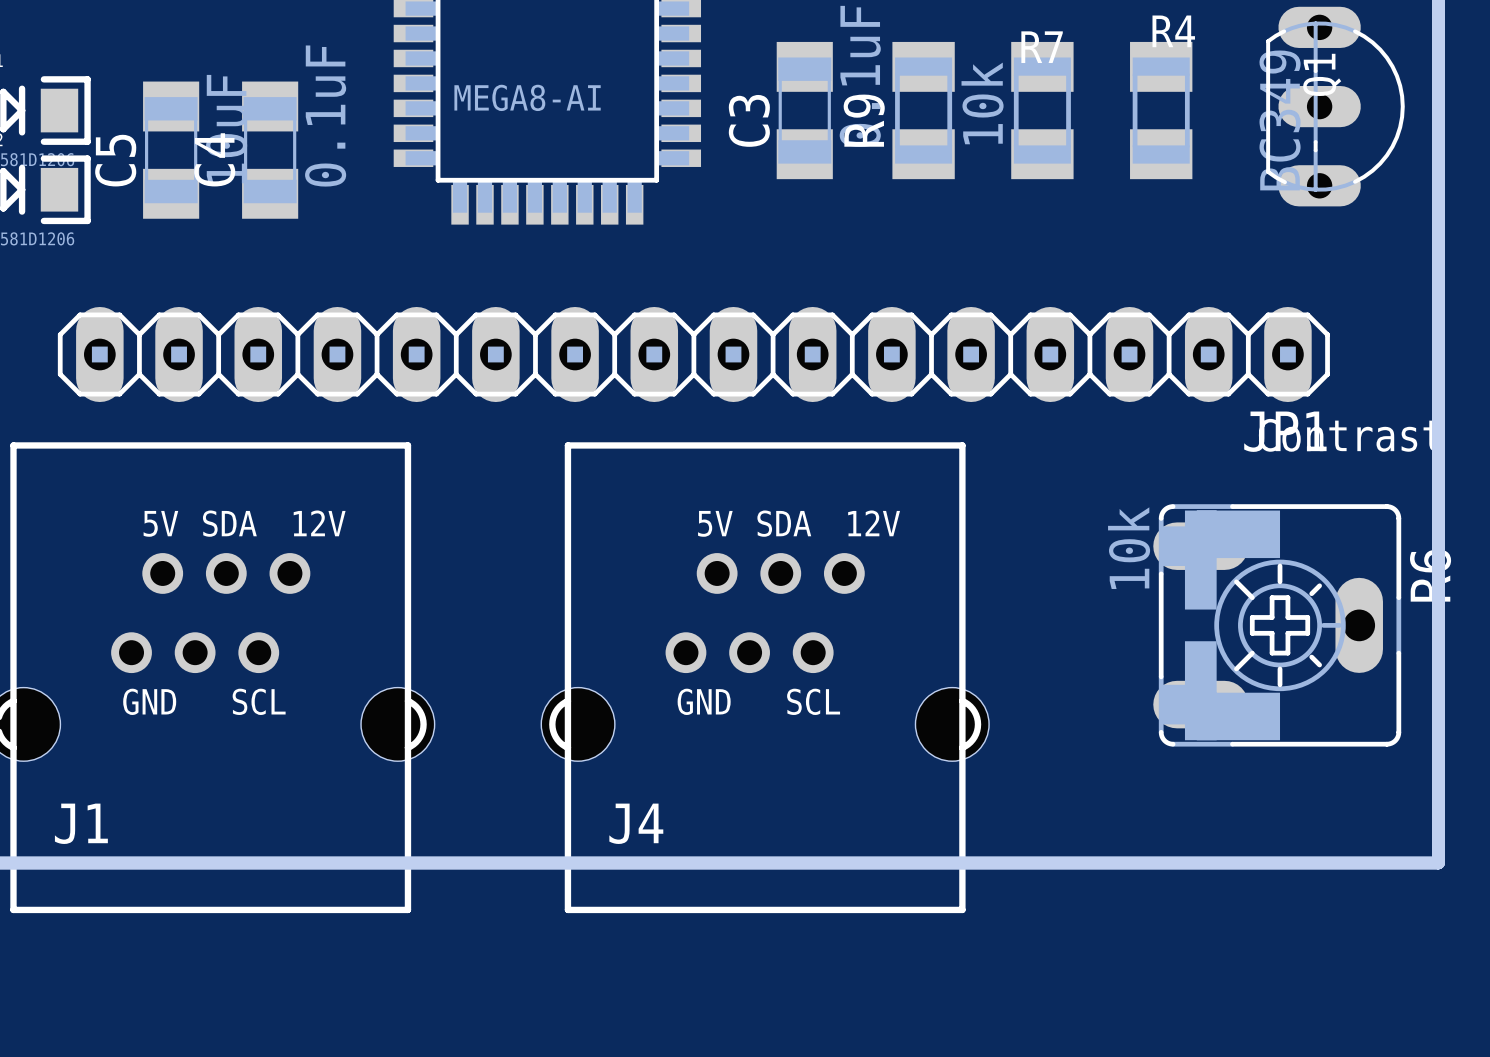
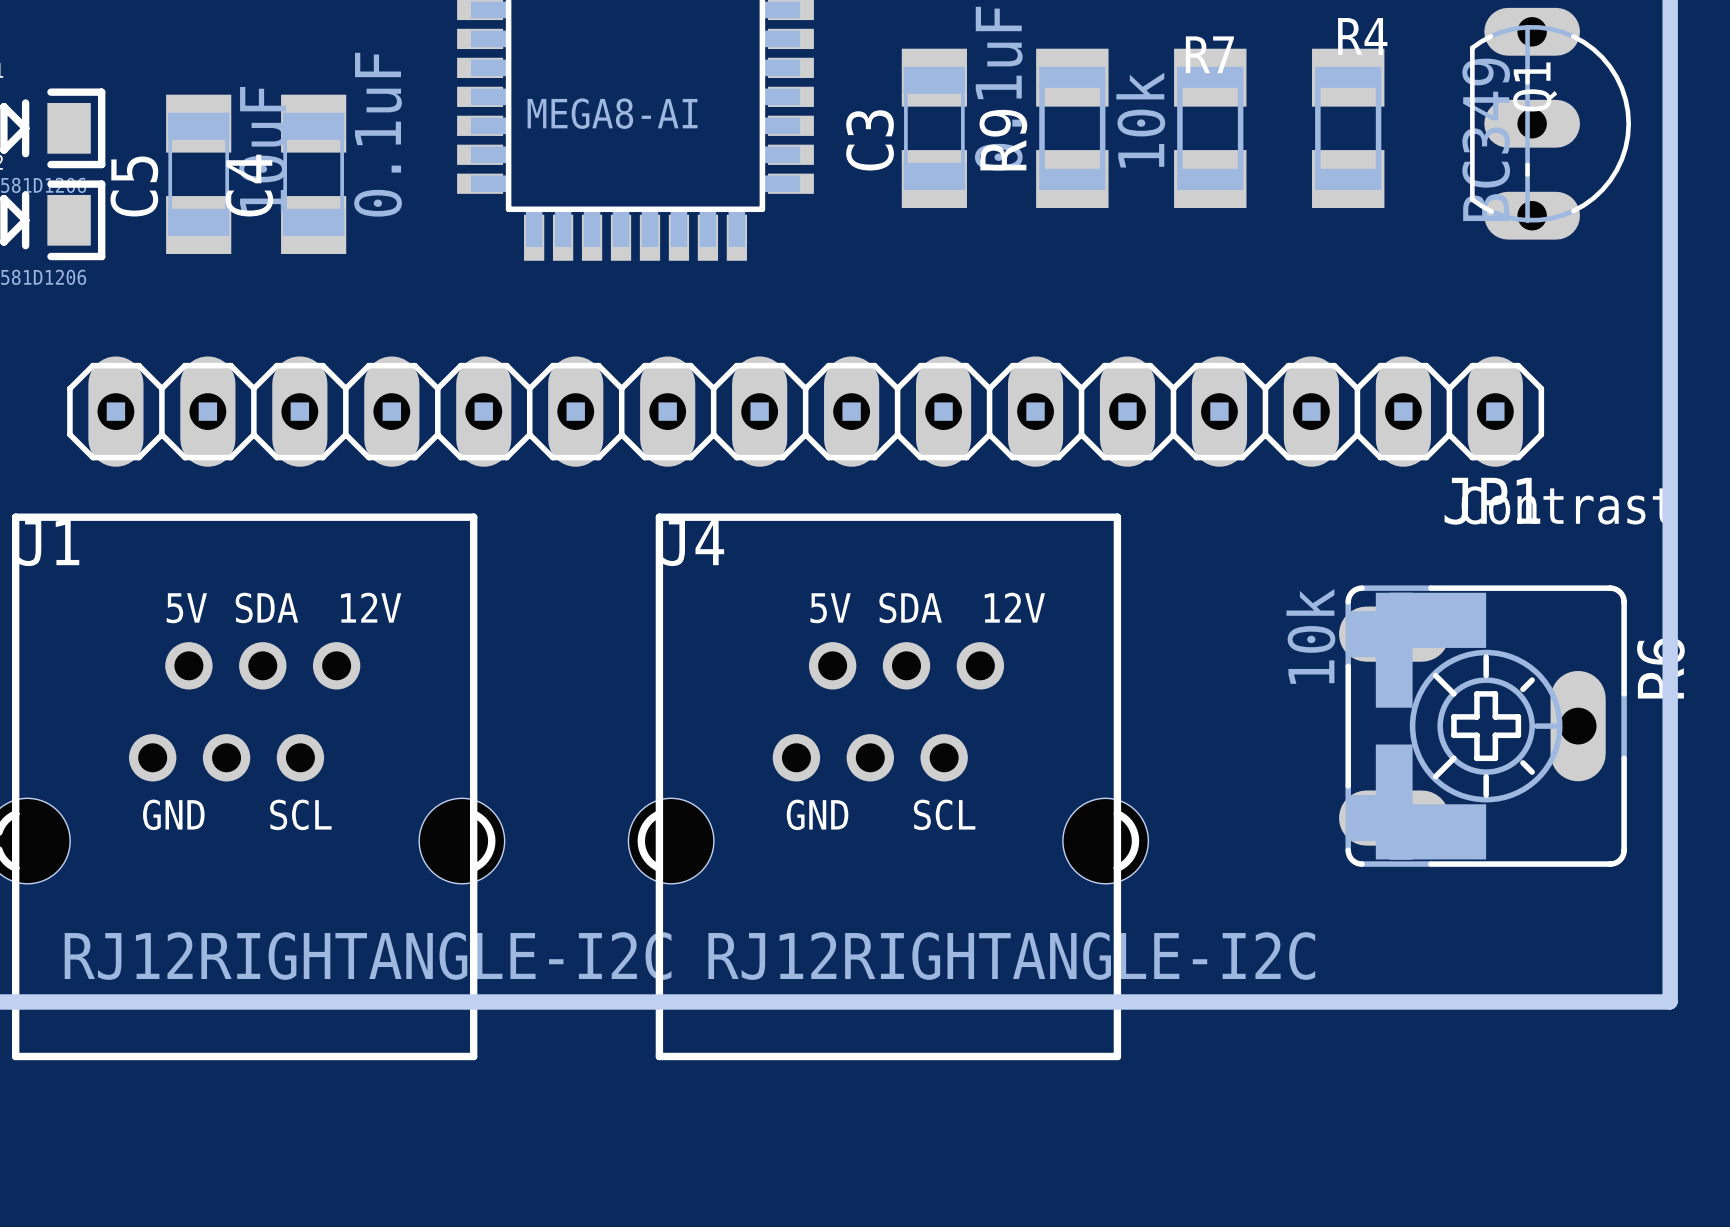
J1 name position: J1 (81, 823) -> J1 (48, 542)
J1 value: none -> RJ12RIGHTANGLE-I2C (368, 956)
J4 name position: J4 (636, 823) -> J4 (692, 542)
J4 value: none -> RJ12RIGHTANGLE-I2C (1011, 956)

